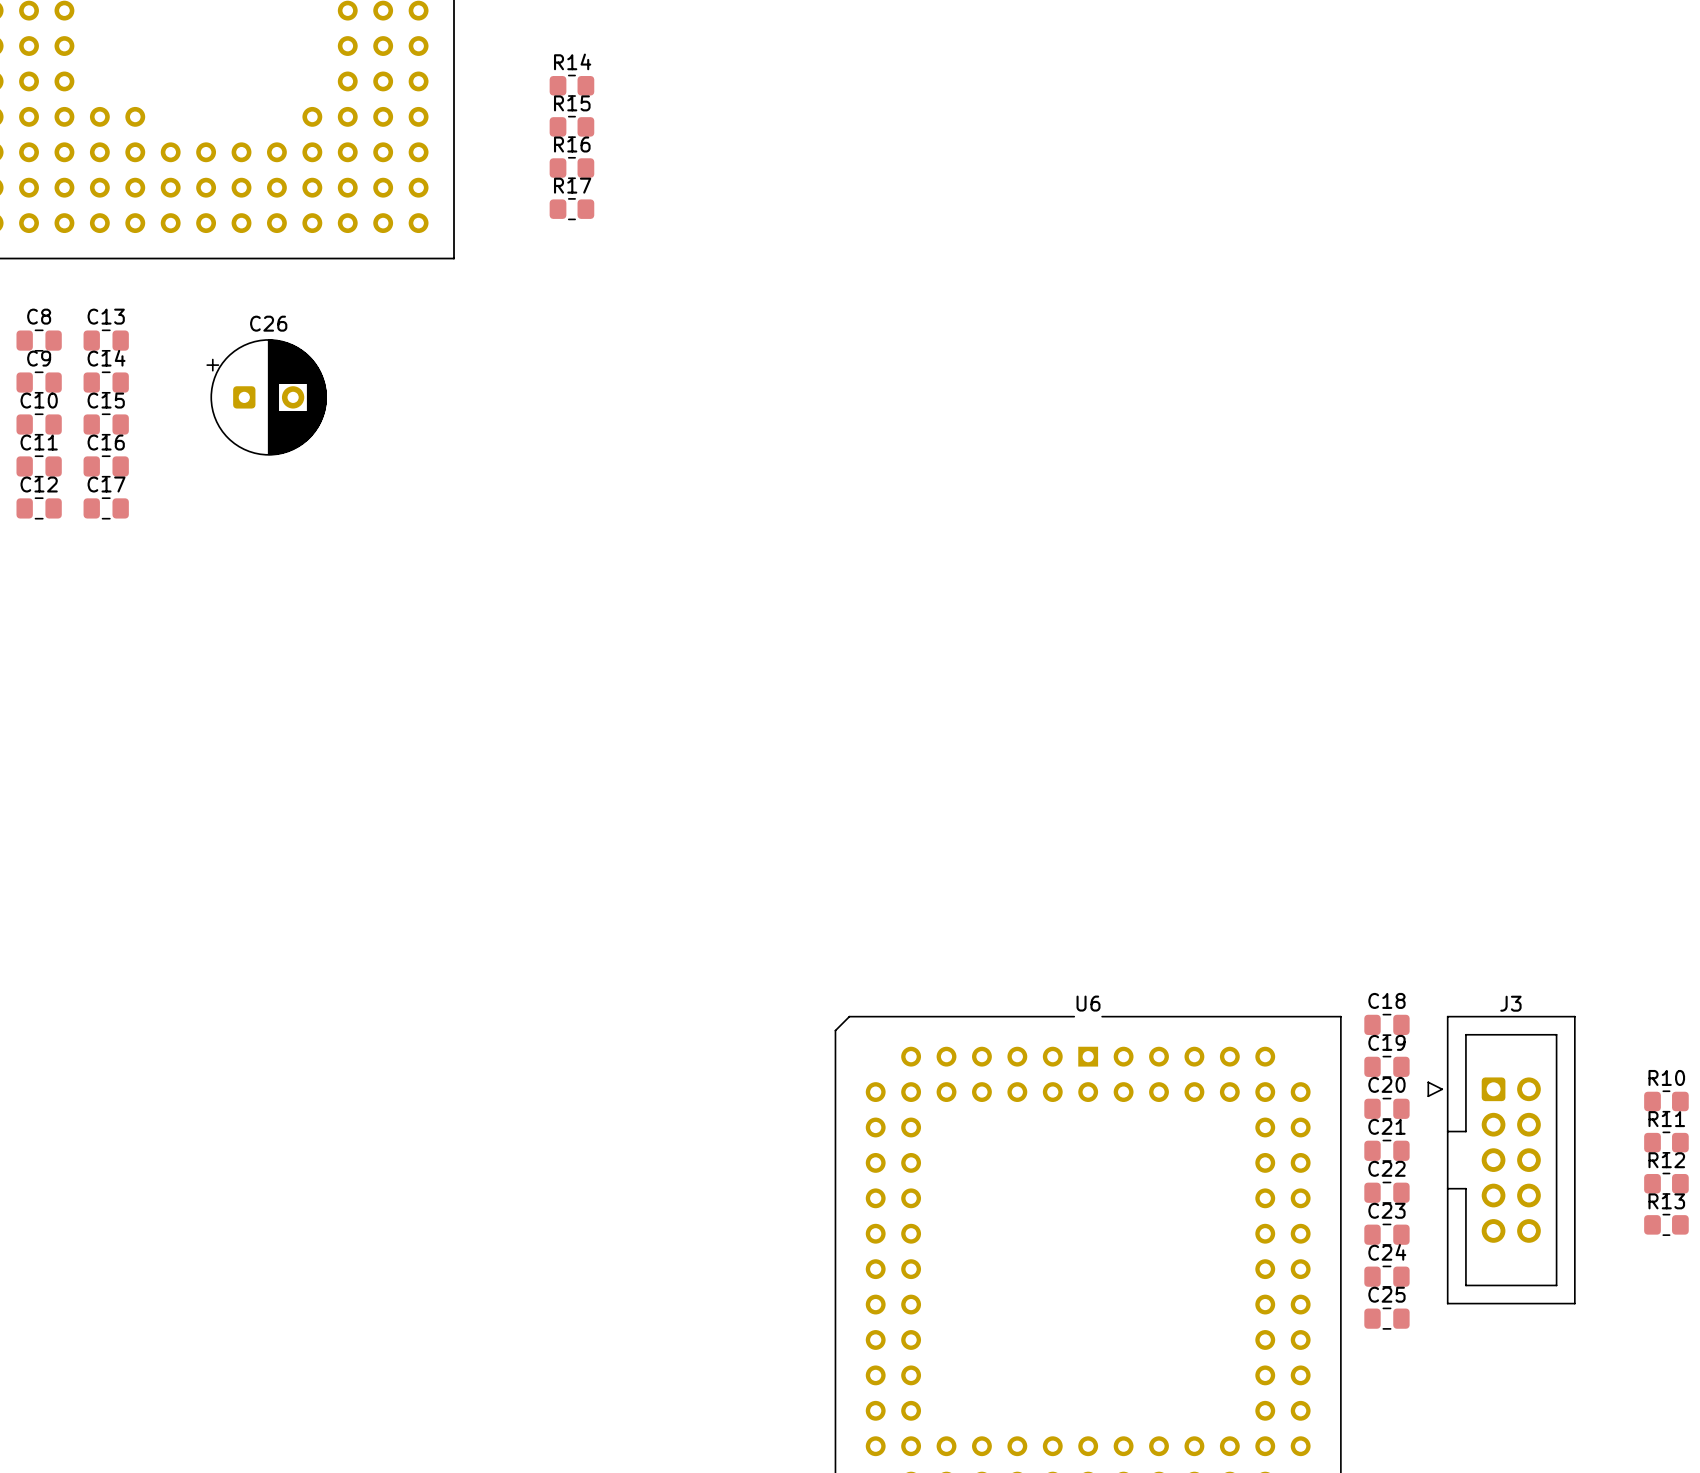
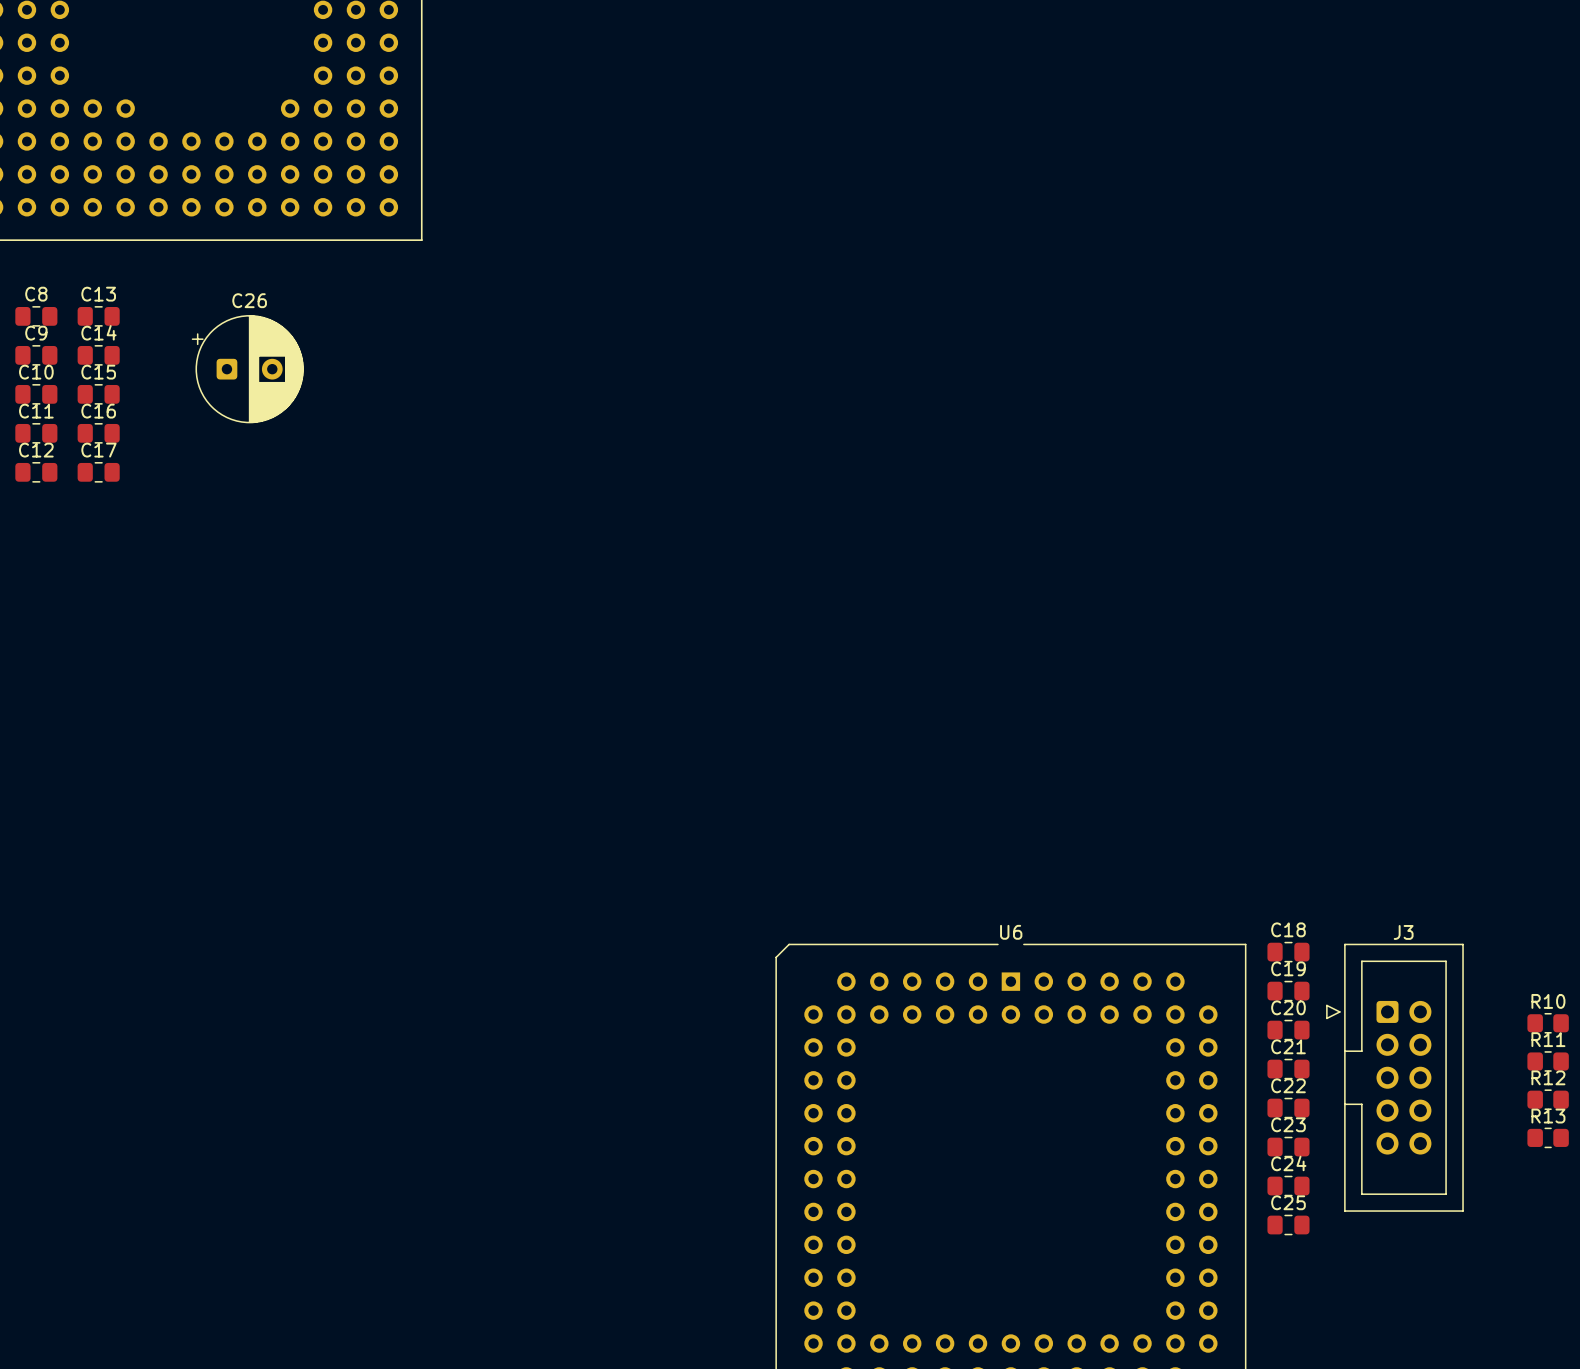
R14: (571, 85) -> none
R15: (571, 126) -> none
R16: (571, 168) -> none
R17: (571, 209) -> none

